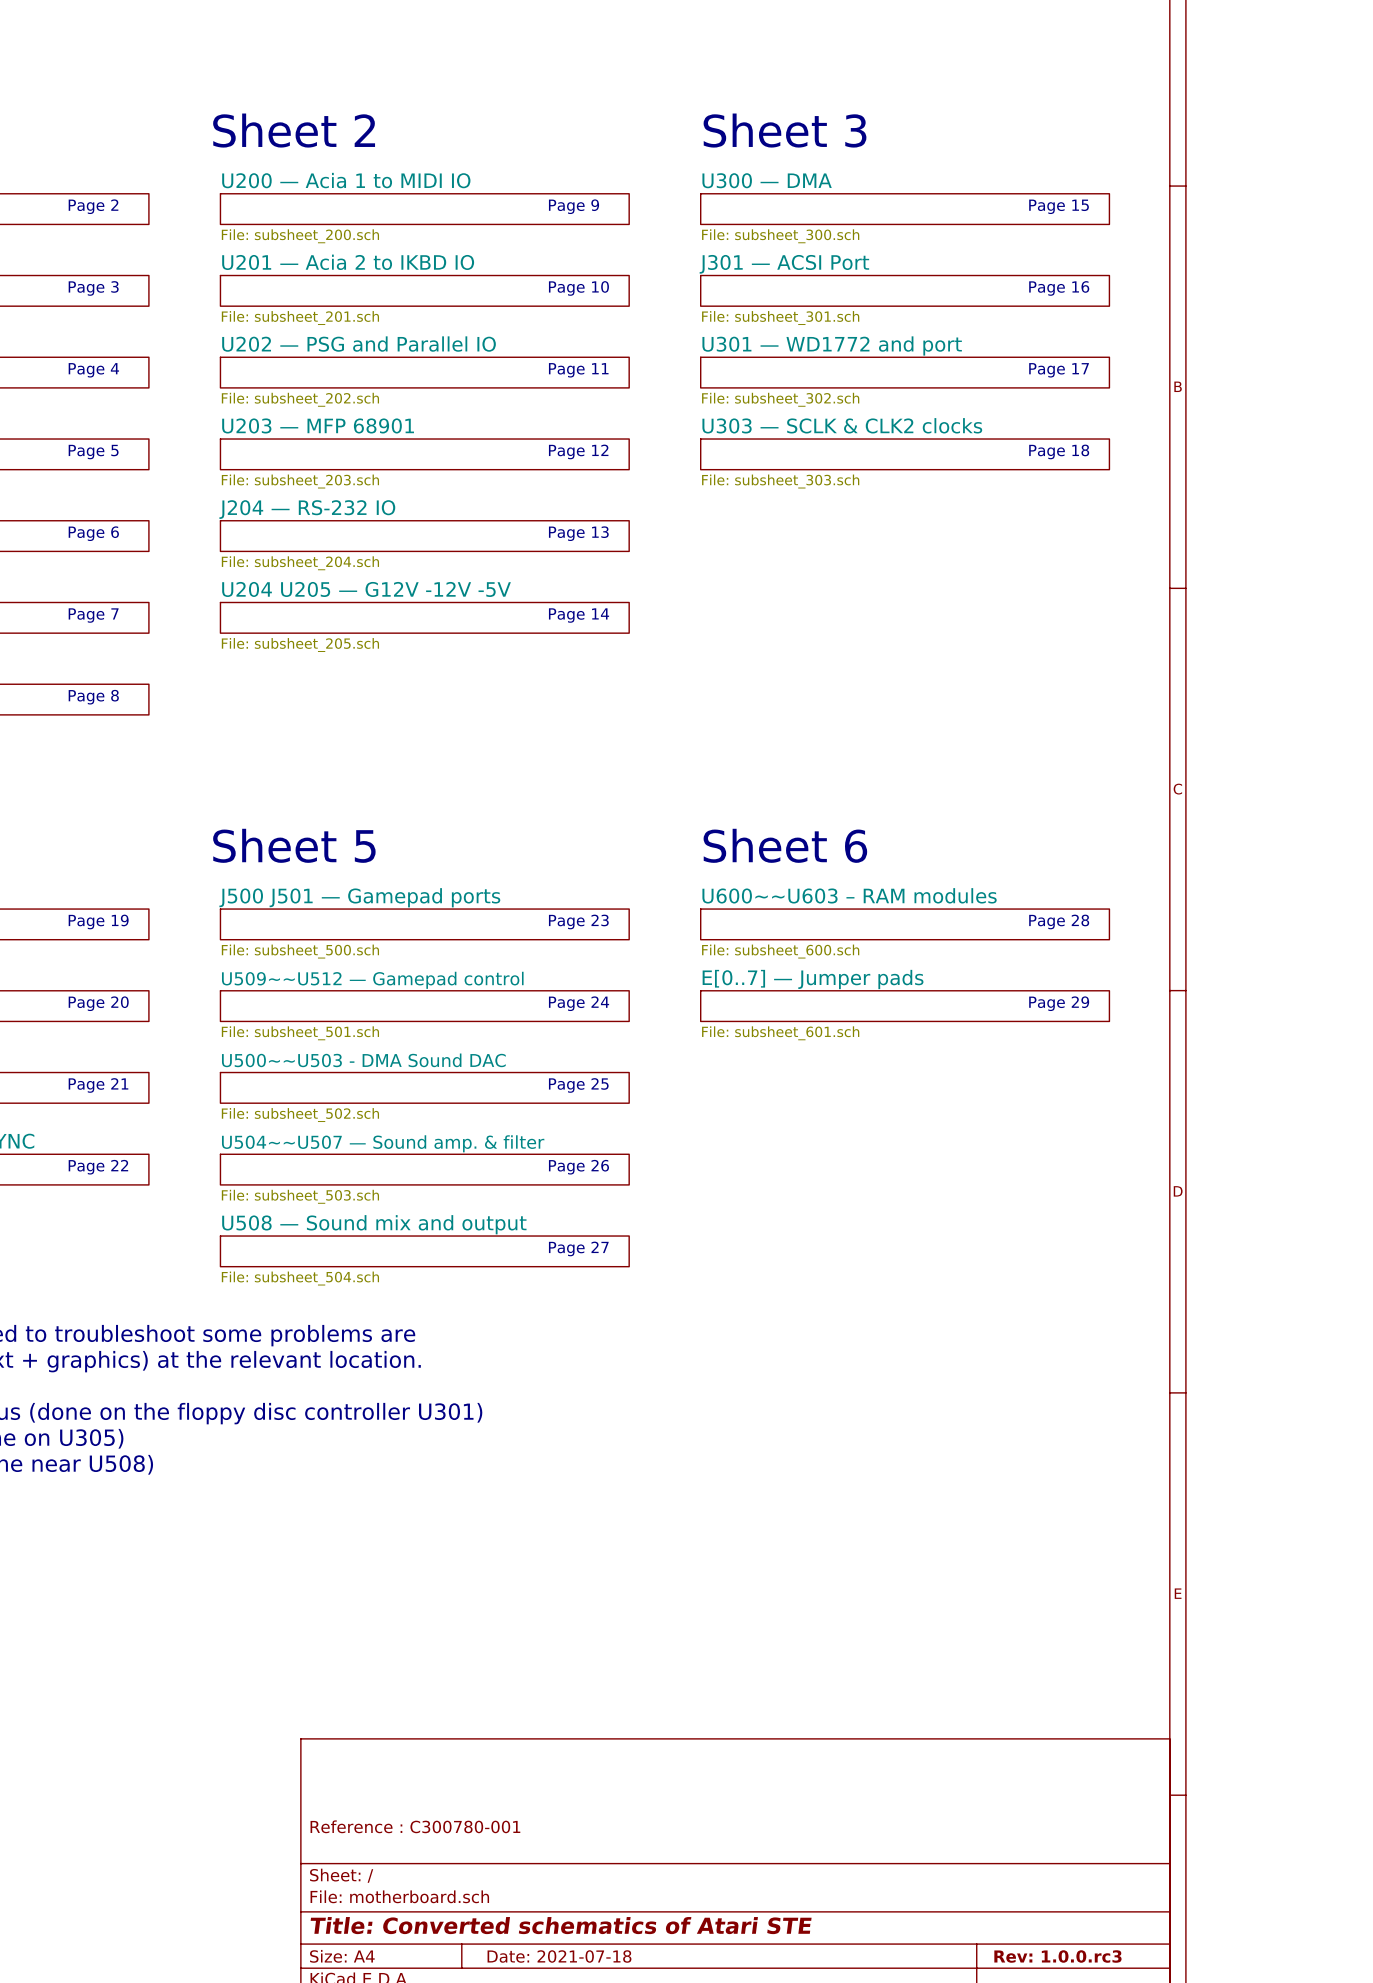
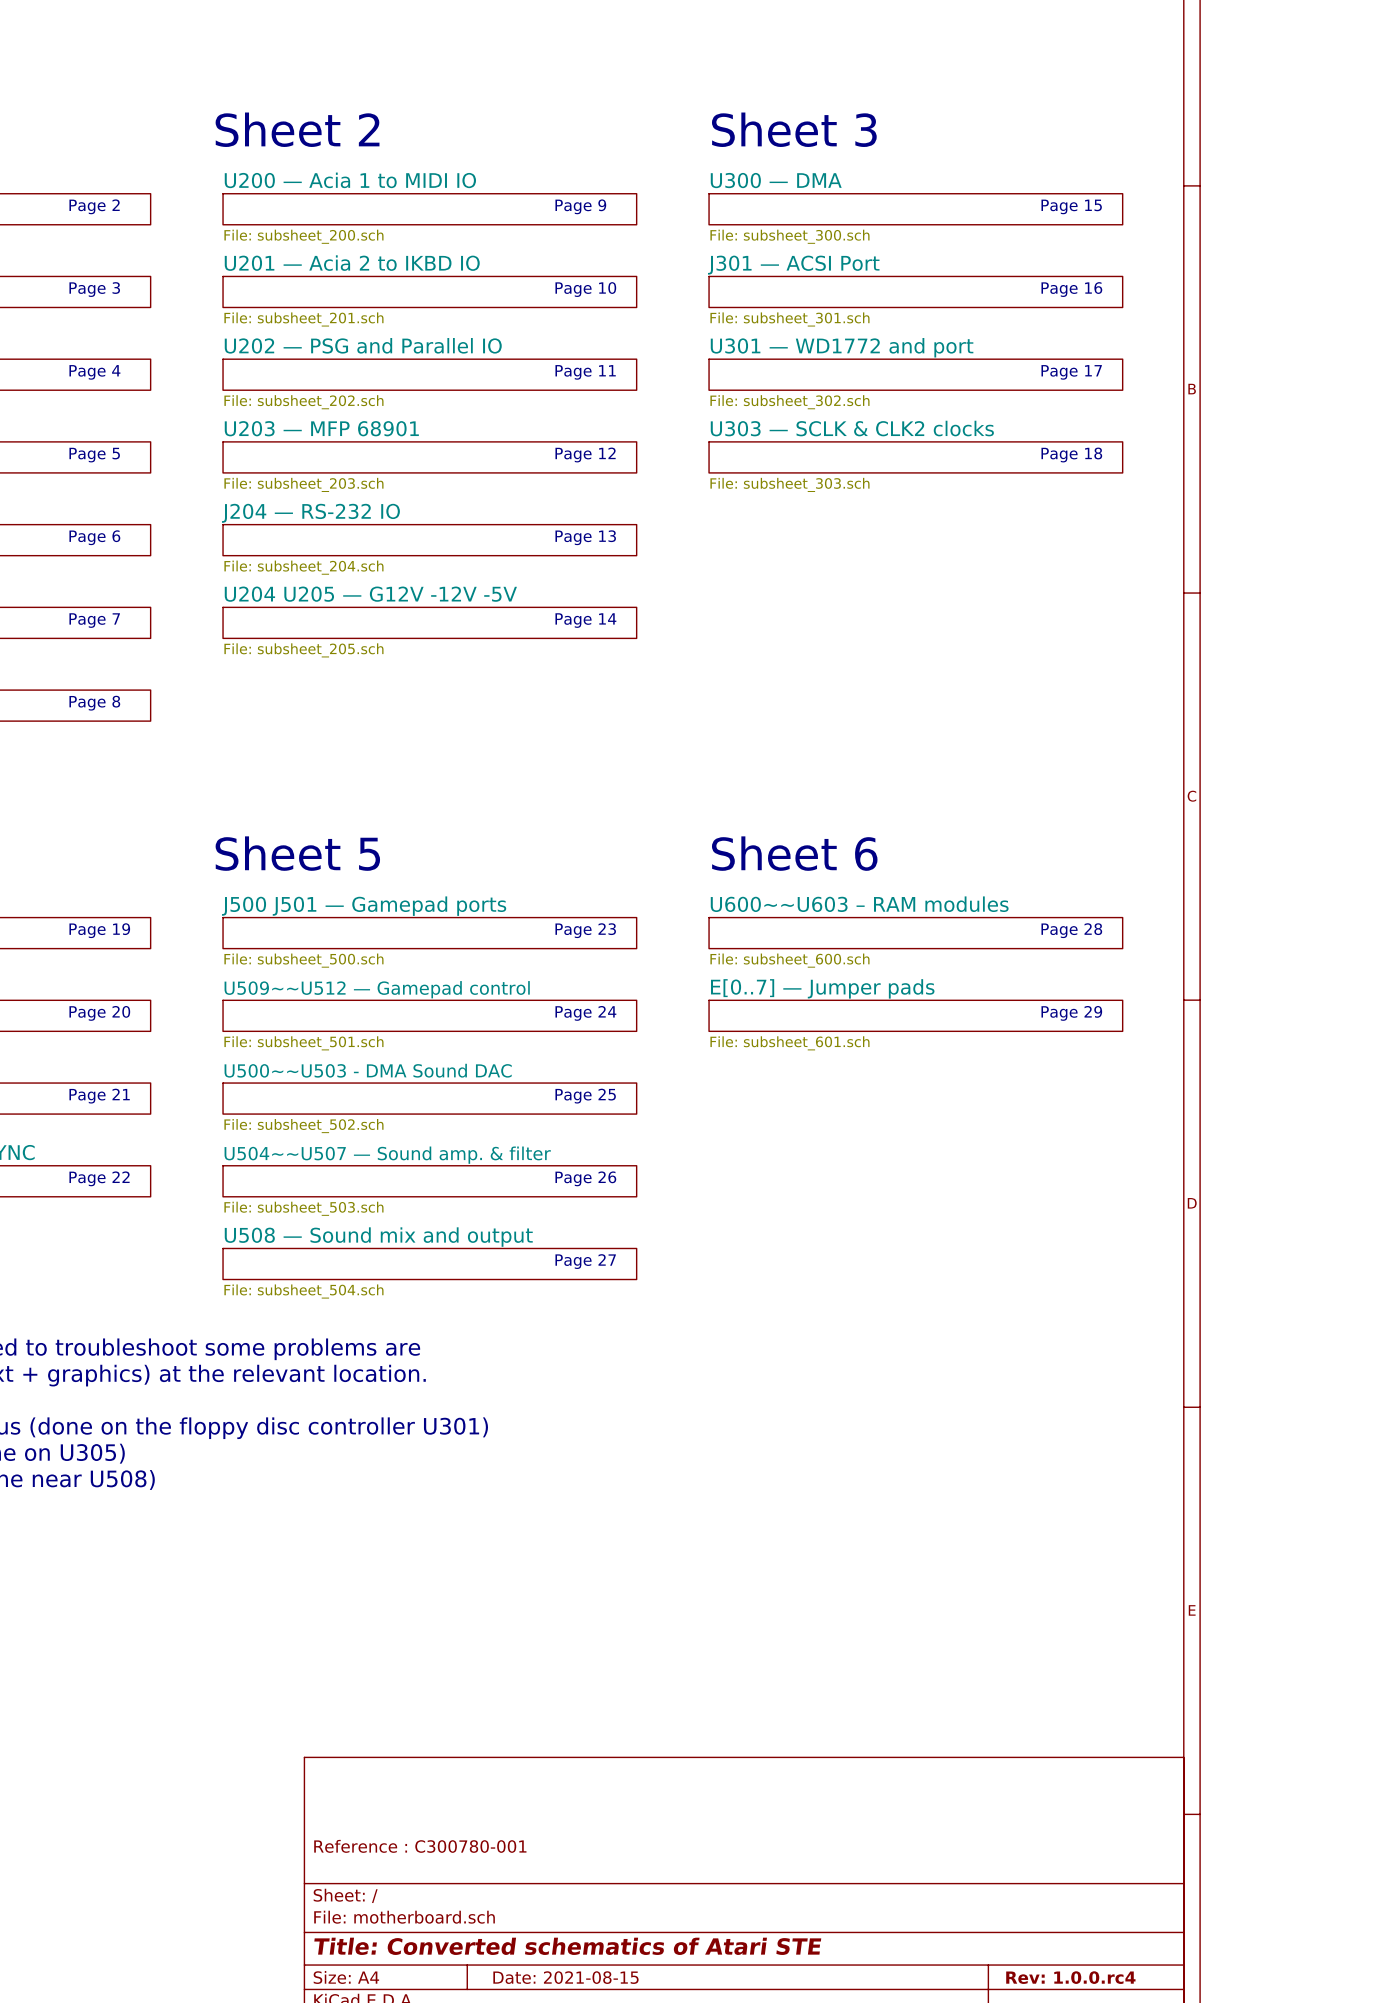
title block: Date: 2021-07-18 (559, 1956) -> Date: 2021-08-15 (565, 1977)
title block: Rev: 1.0.0.rc3 (1057, 1956) -> Rev: 1.0.0.rc4 (1070, 1977)

